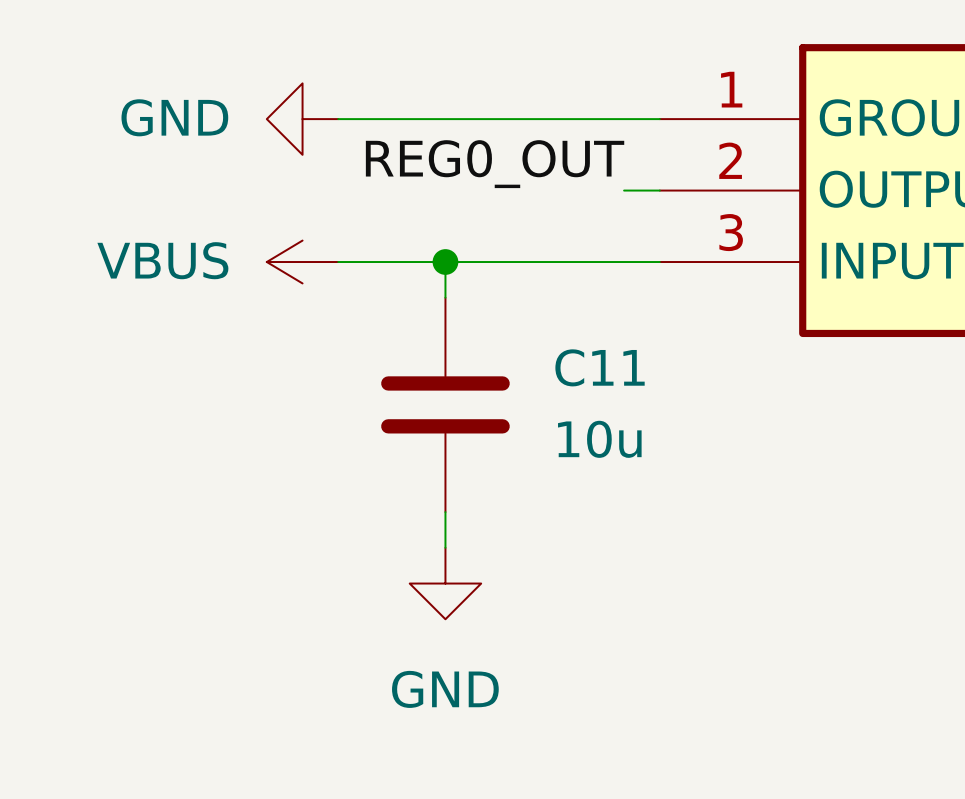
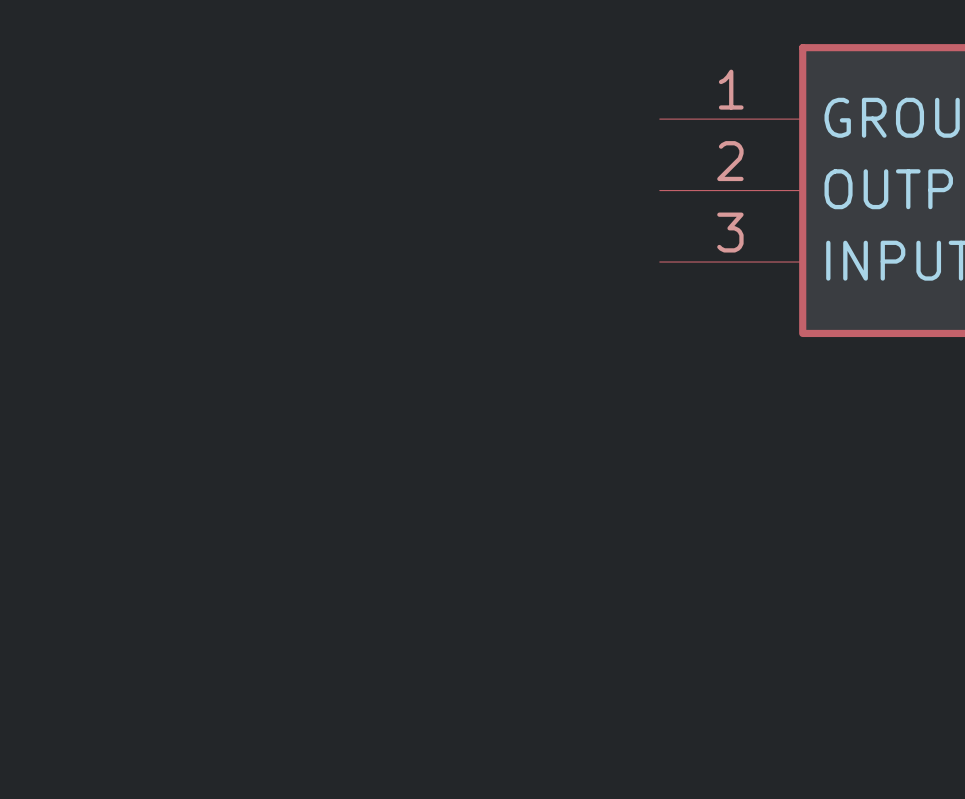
power symbol: GND (302, 119) -> none
wire: (338, 119) (659, 119) -> none
label: REG0_OUT (495, 164) -> none
wire: (624, 190) (659, 190) -> none
power symbol: VBUS (302, 262) -> none
wire: (338, 262) (659, 262) -> none
wire: (445, 262) (445, 297) -> none
junction: (445, 262) -> none
C11: 10u (445, 404) -> none
wire: (445, 512) (445, 547) -> none
power symbol: GND (445, 583) -> none

